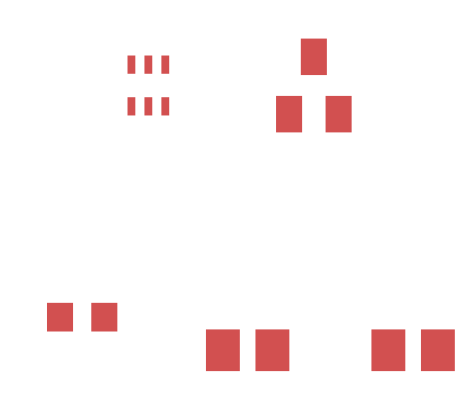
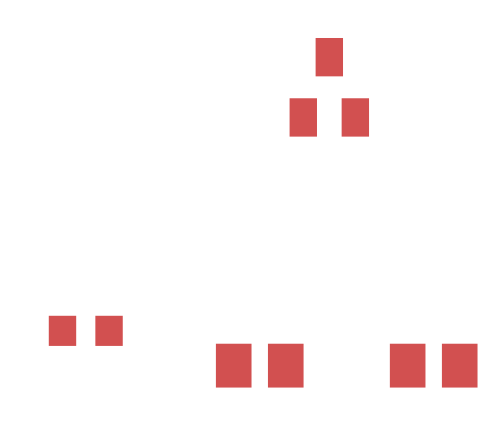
part: (148, 85) -> none

